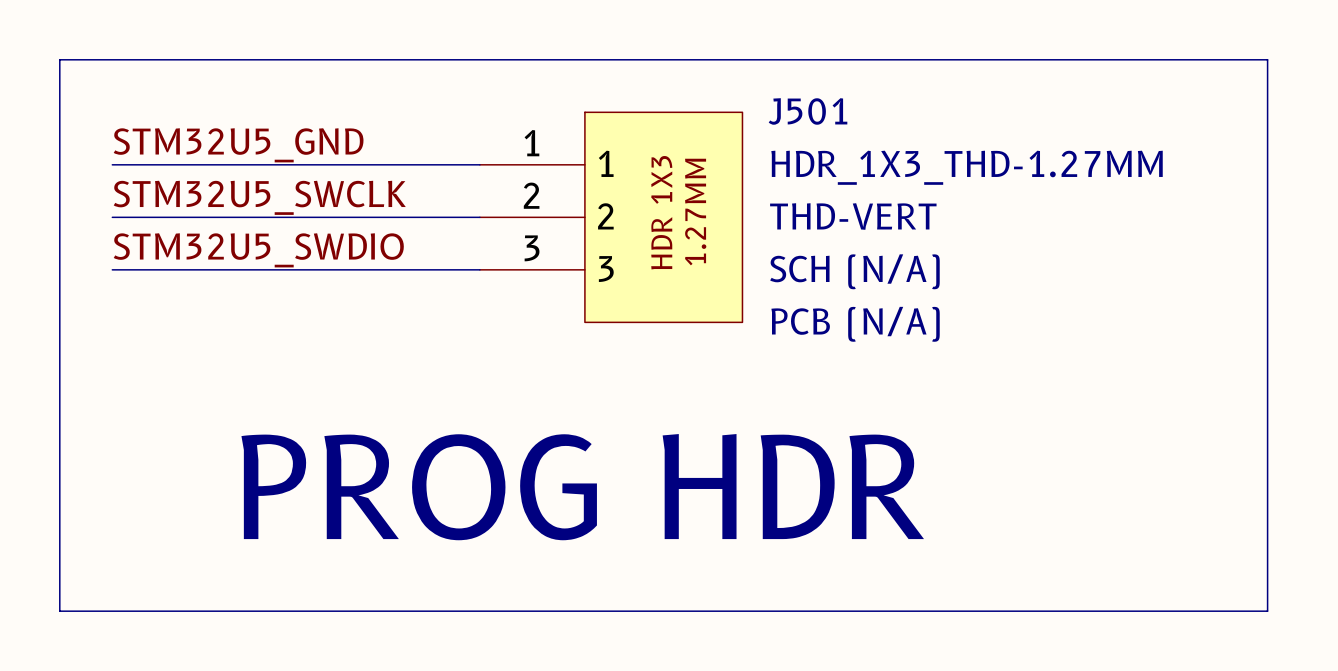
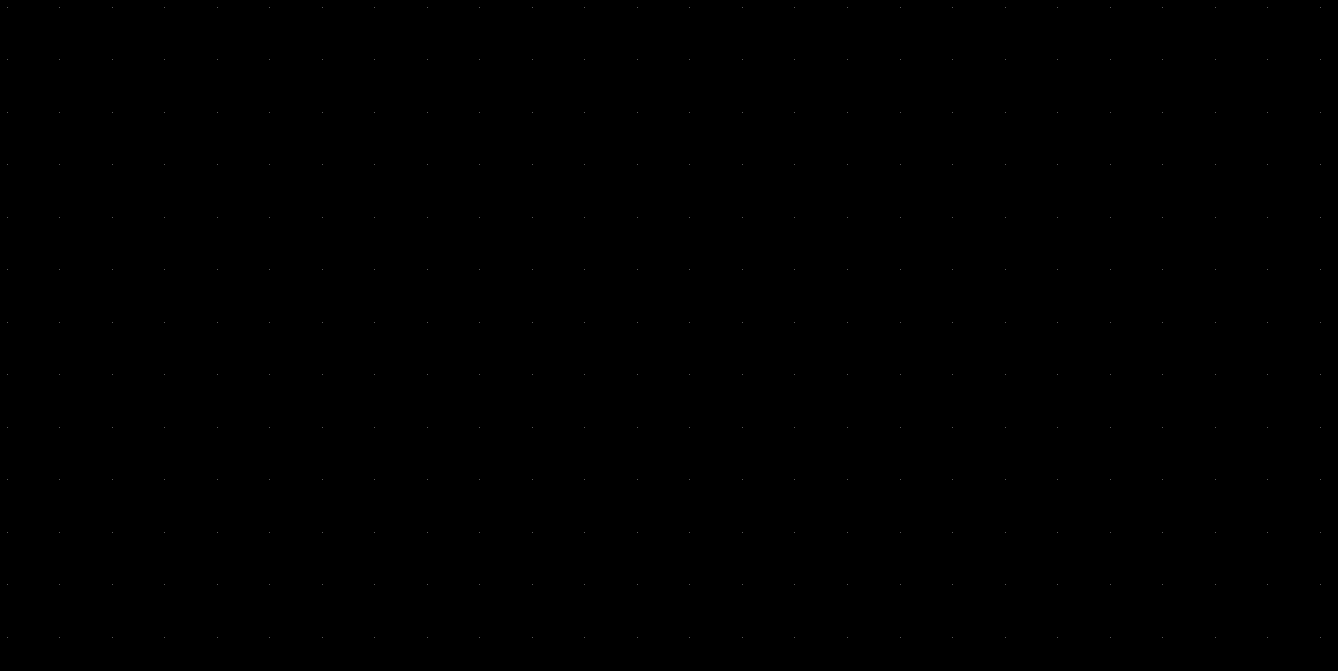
line: (59, 59) (1267, 59) (1267, 611) (59, 611) (59, 59) -> none
label: STM32U5_GND (238, 145) -> none
wire: (112, 164) (479, 164) -> none
label: STM32U5_SWCLK (259, 197) -> none
wire: (112, 217) (479, 217) -> none
J501: HDR_1X3_THD-1.27MM (611, 217) -> none
label: STM32U5_SWDIO (258, 250) -> none
wire: (112, 269) (479, 269) -> none
text: PROG HDR (582, 487) -> none

